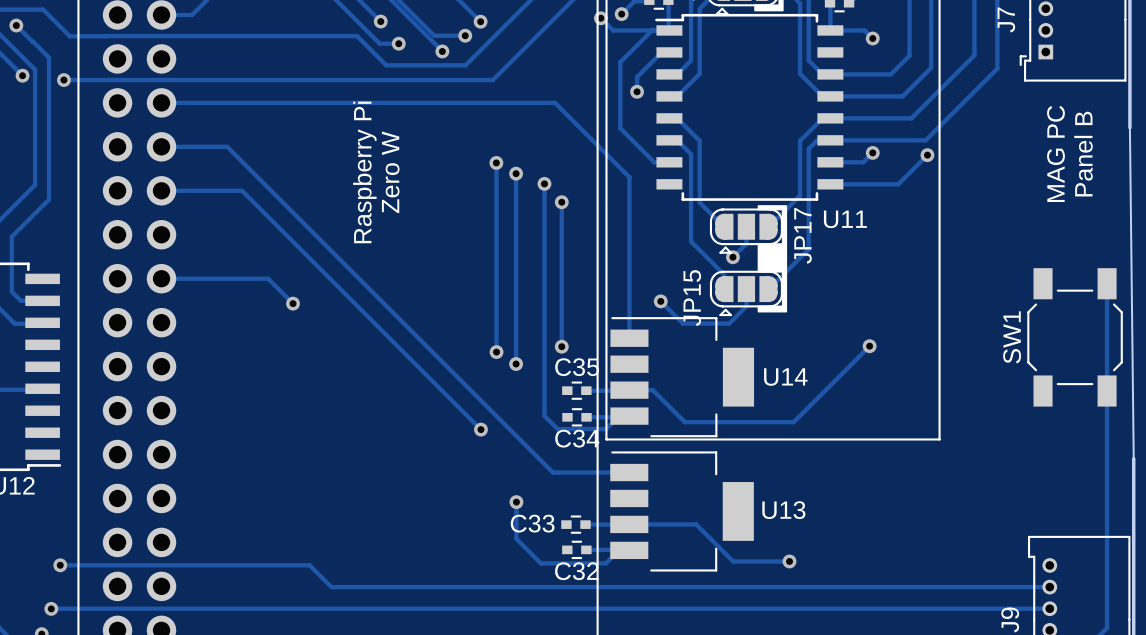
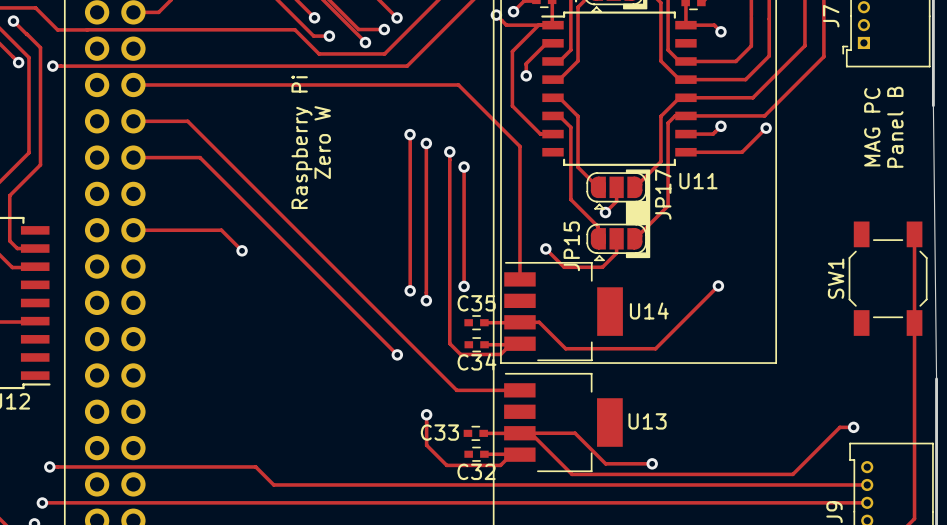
track: none -> (853, 427) (839, 427) (792, 474) (572, 474) (530, 433)
via: none -> (853, 427)

